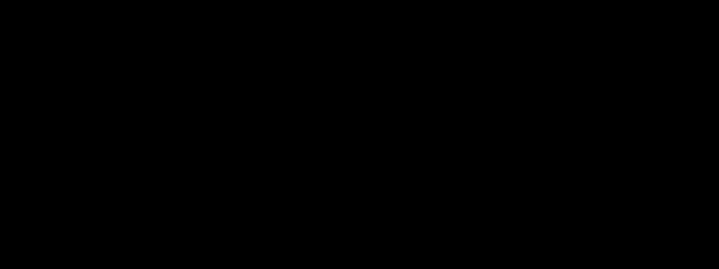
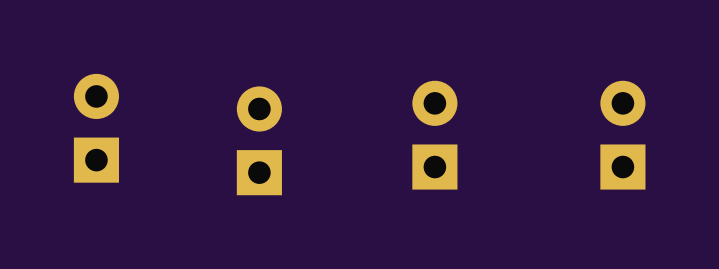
part: none -> (96, 128)
part: none -> (434, 135)
part: none -> (622, 135)
part: none -> (259, 140)

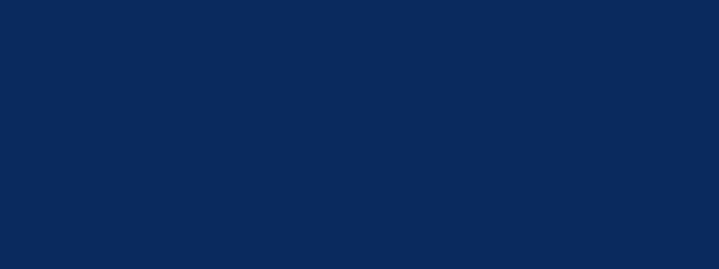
part: (96, 128) -> none
part: (434, 135) -> none
part: (622, 135) -> none
part: (259, 140) -> none

